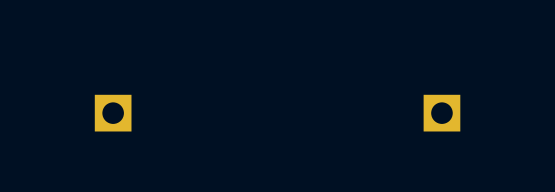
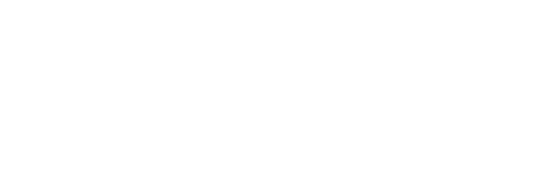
part: (113, 113) -> none
part: (441, 113) -> none

